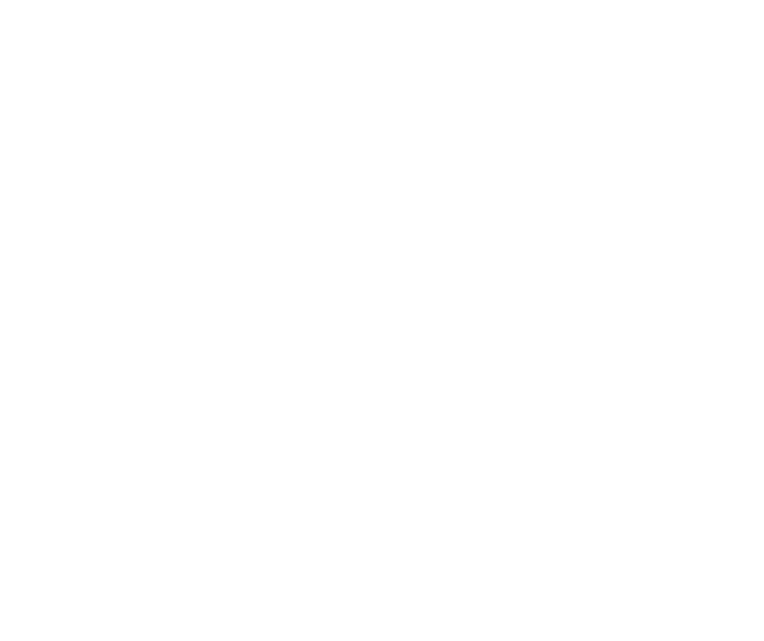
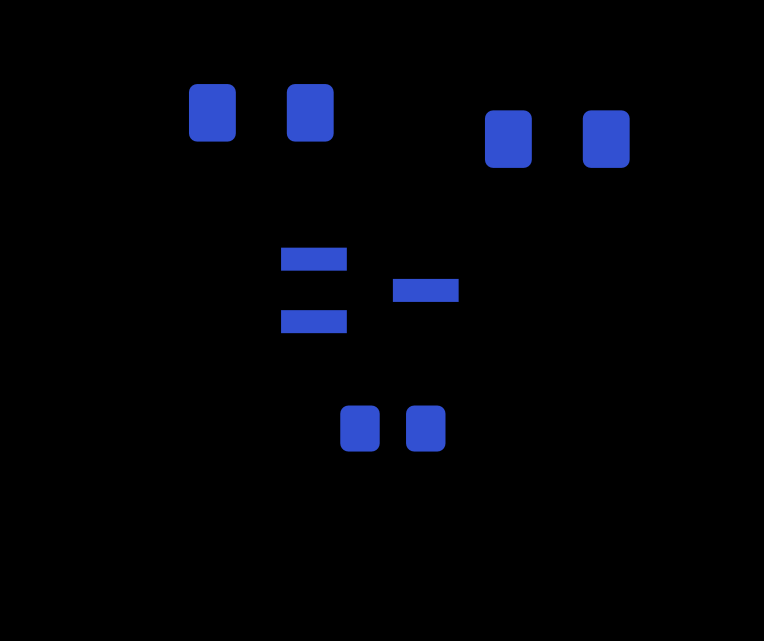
part: none -> (261, 112)
part: none -> (557, 139)
part: none -> (369, 290)
part: none -> (392, 428)

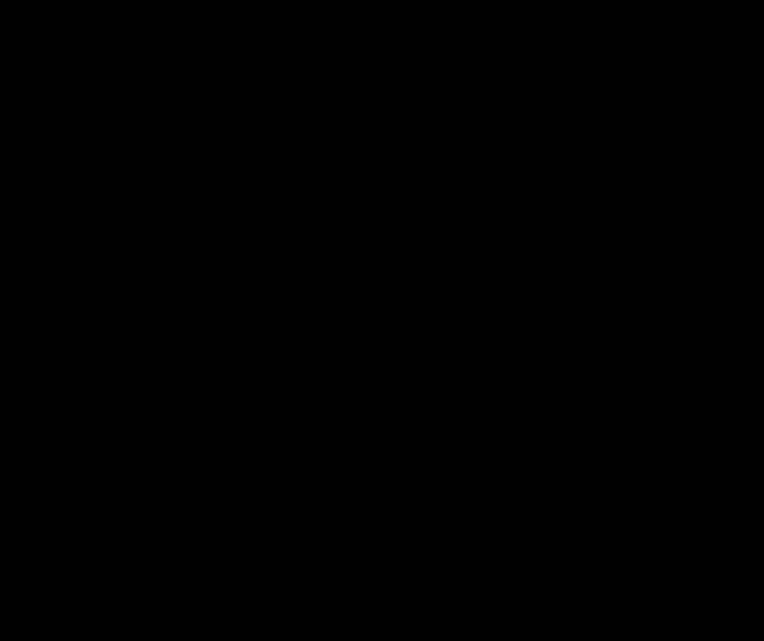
part: (261, 112) -> none
part: (557, 139) -> none
part: (369, 290) -> none
part: (392, 428) -> none

